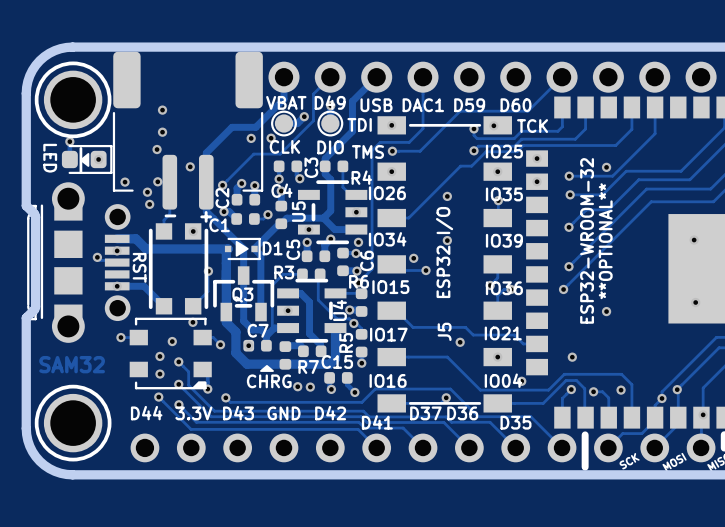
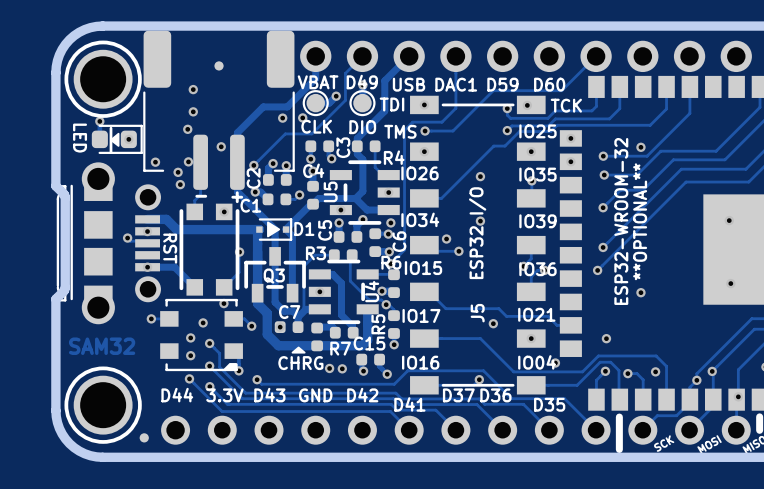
part: none -> (219, 65)
part: none -> (144, 437)

